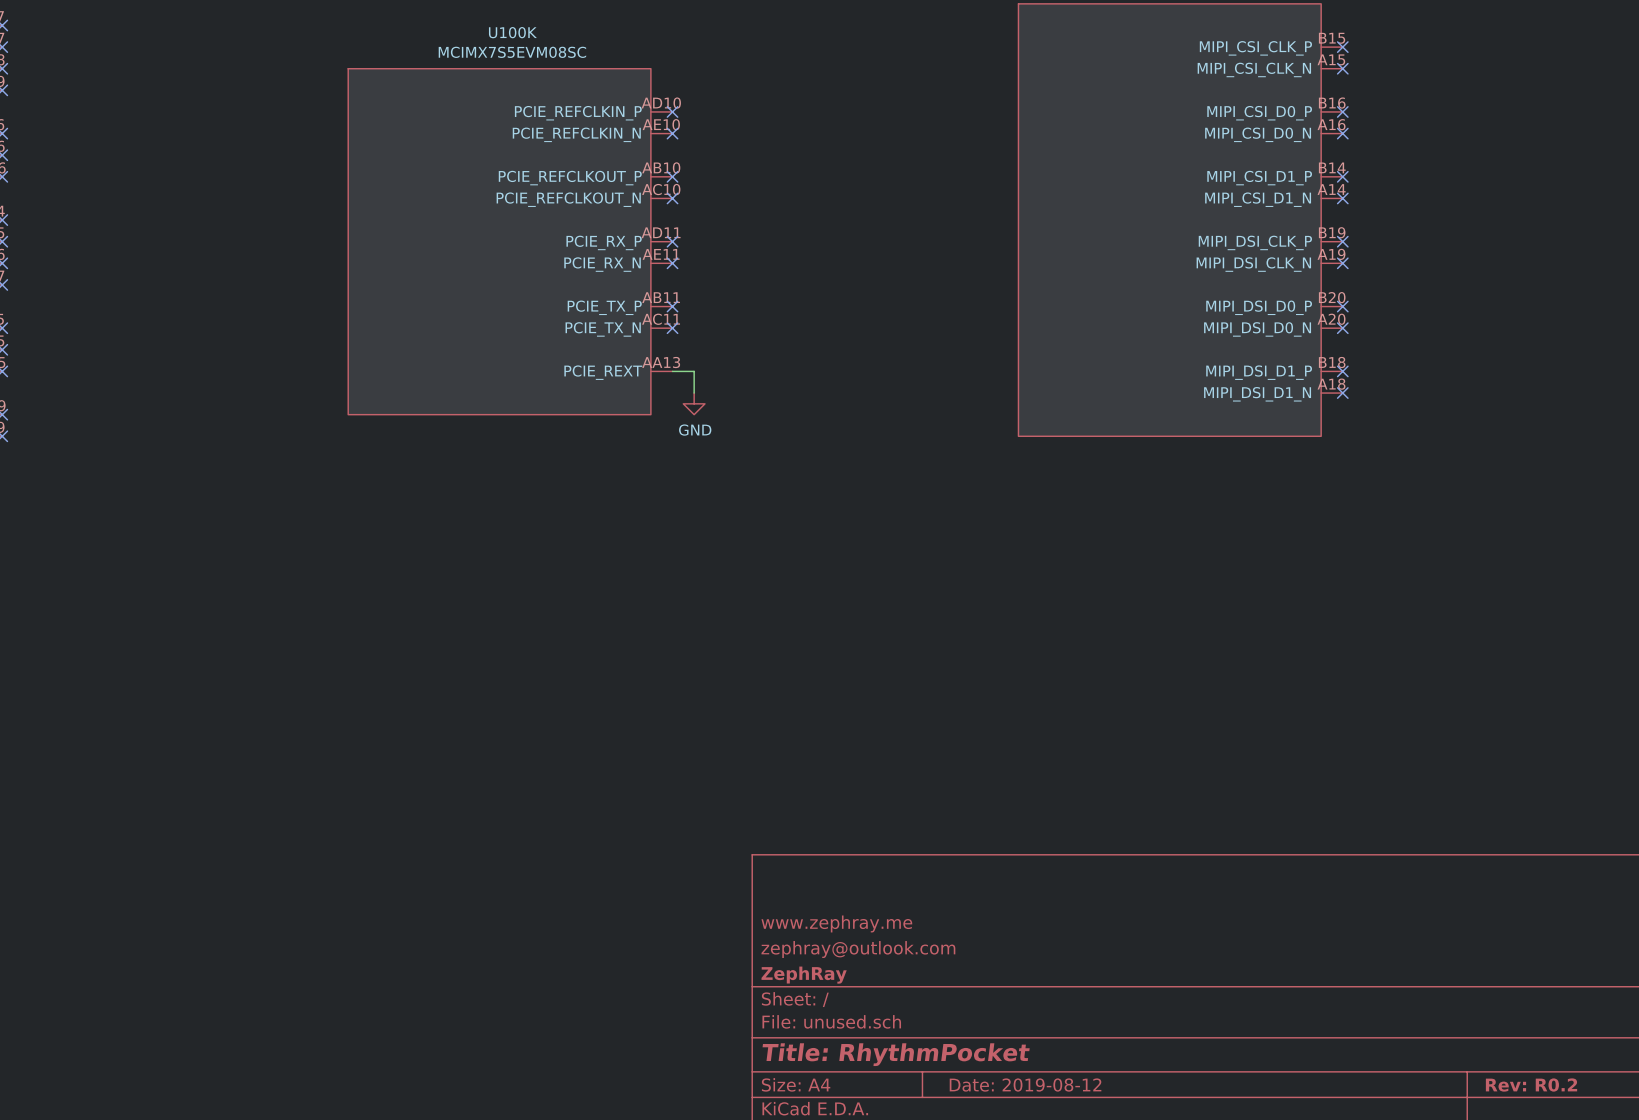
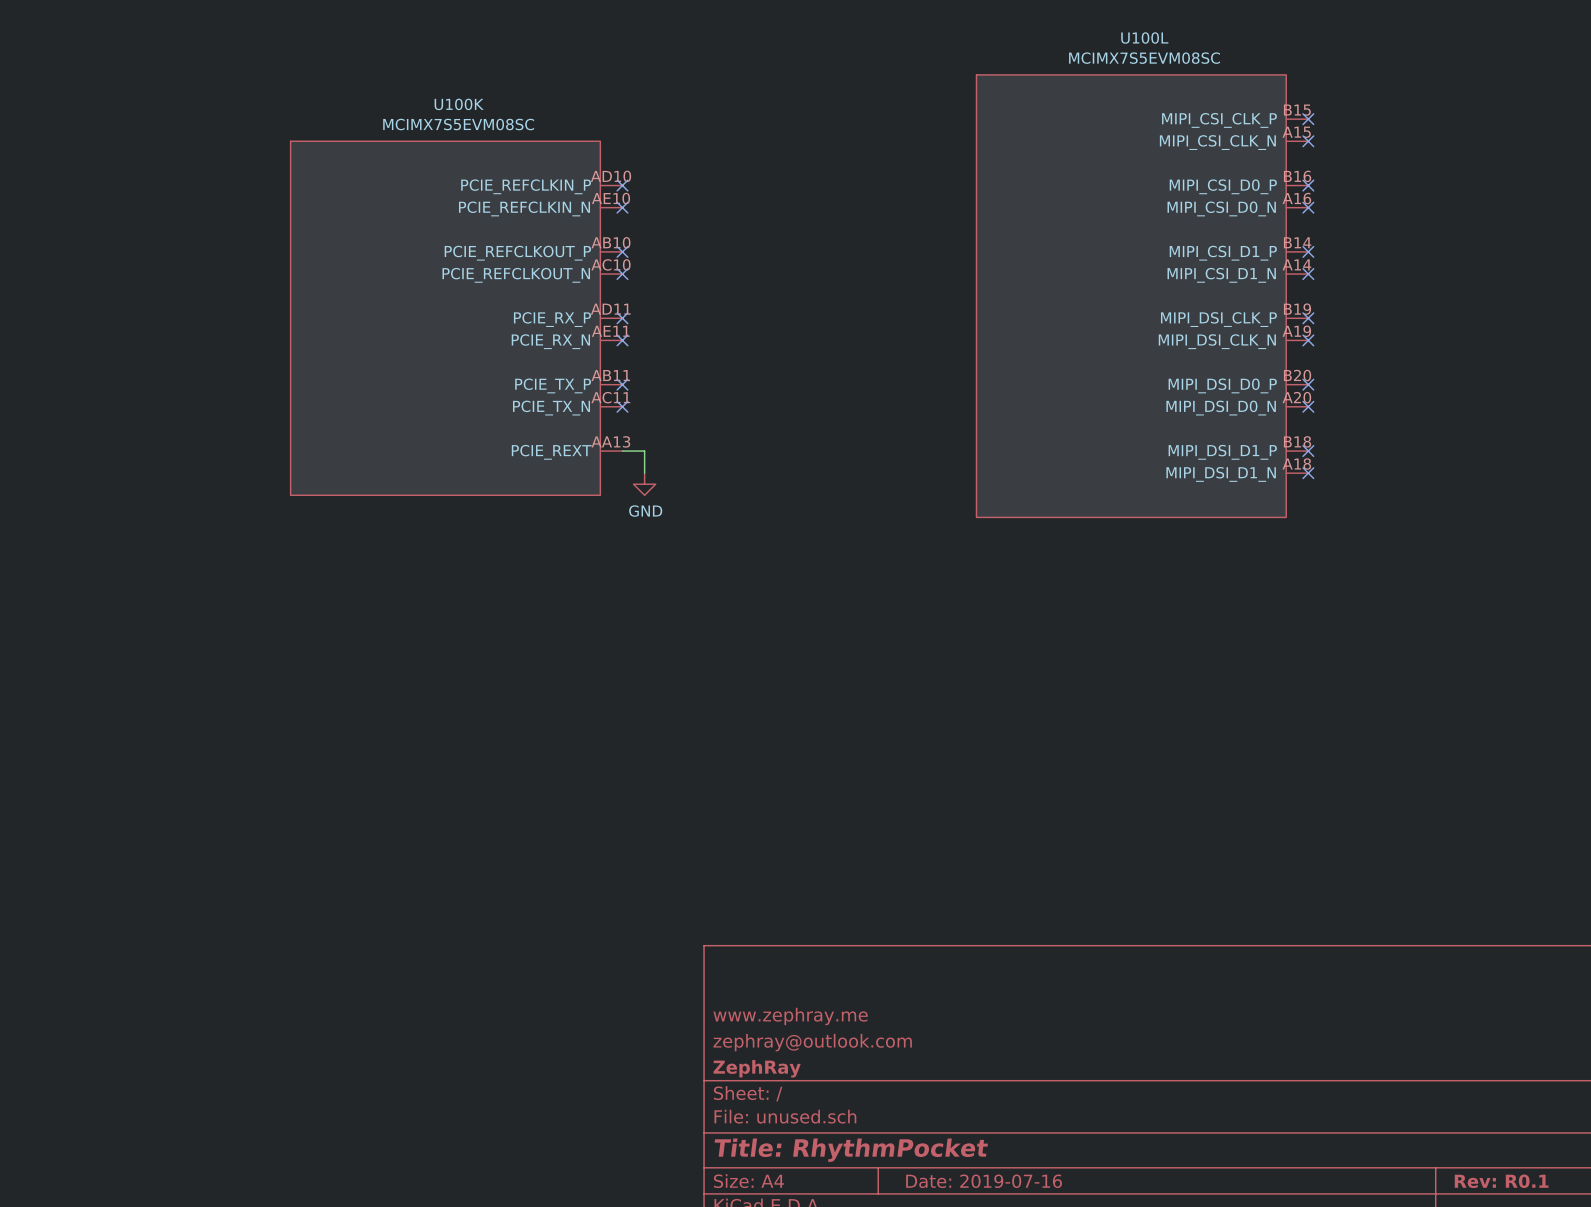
title block: Date: 2019-08-12 (1025, 1085) -> Date: 2019-07-16 (984, 1181)
title block: Rev: R0.2 (1531, 1085) -> Rev: R0.1 (1501, 1181)

